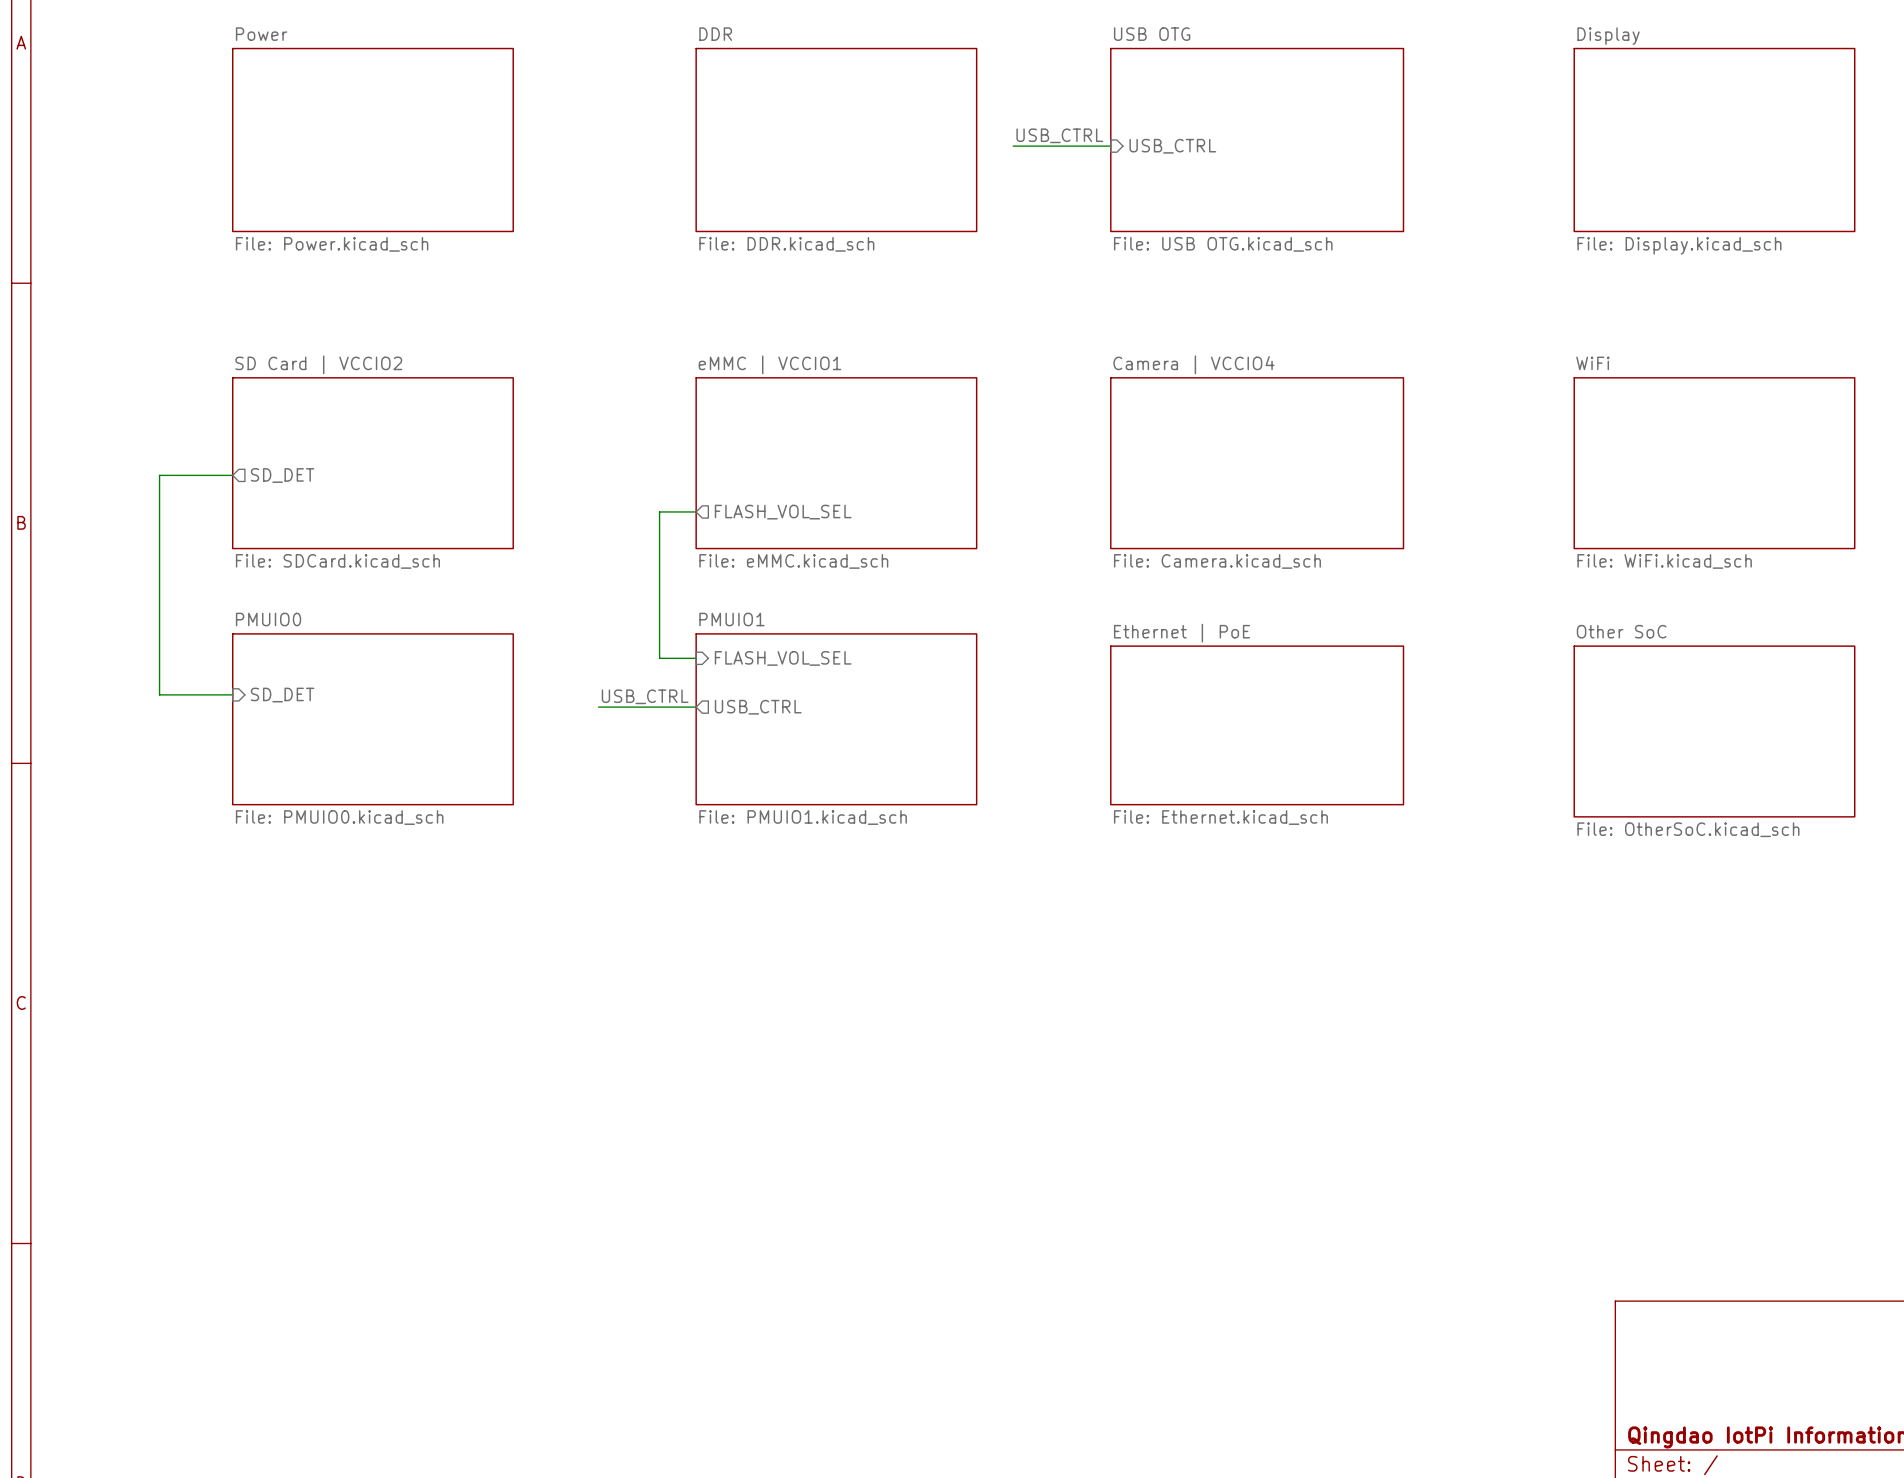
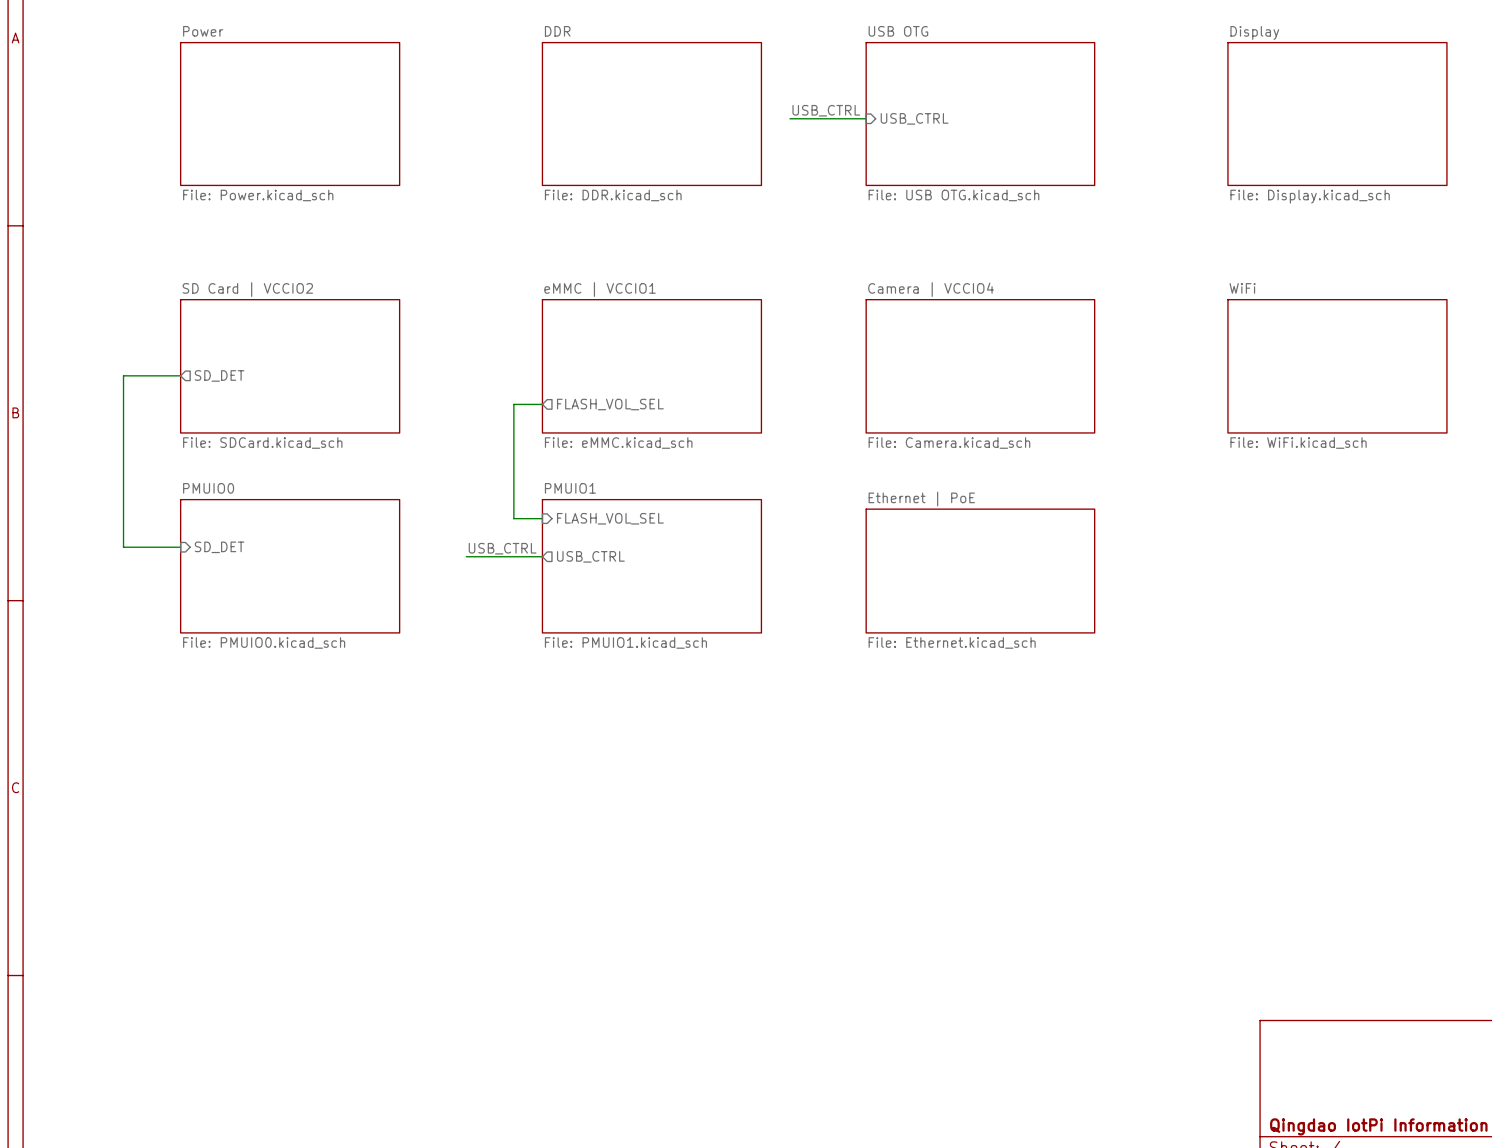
sheet Other SoC: File: OtherSoC.kicad_sch (1714, 731) -> none

